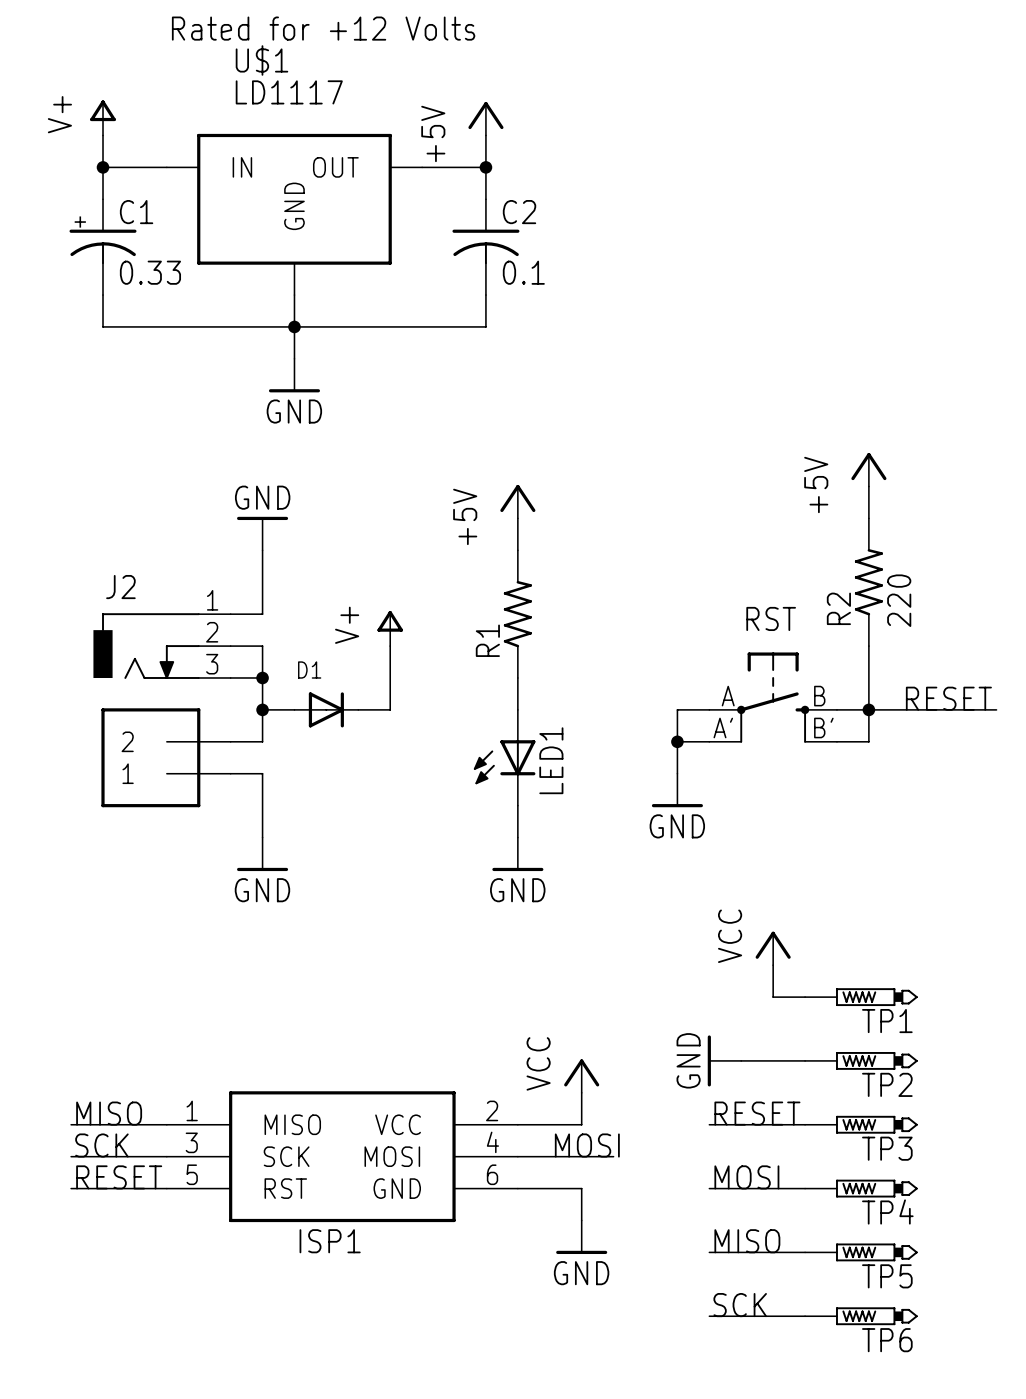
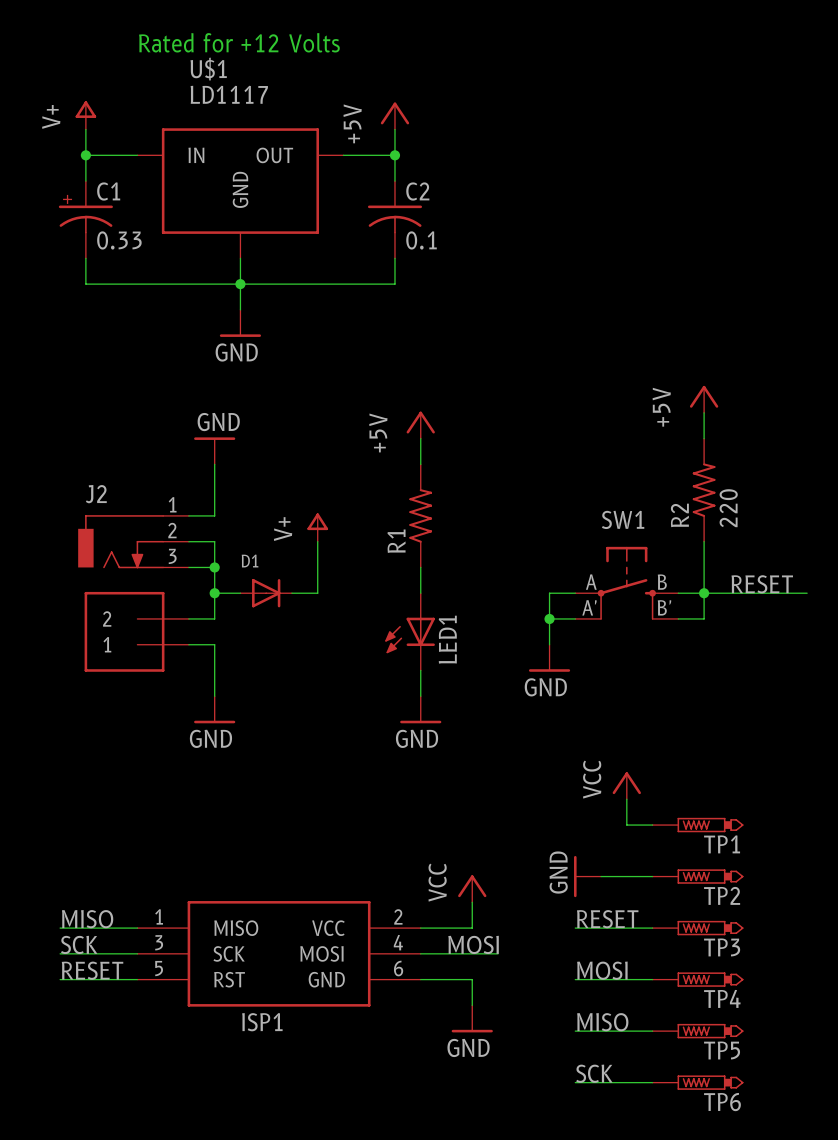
RST name: RST (771, 618) -> SW1 (623, 519)

